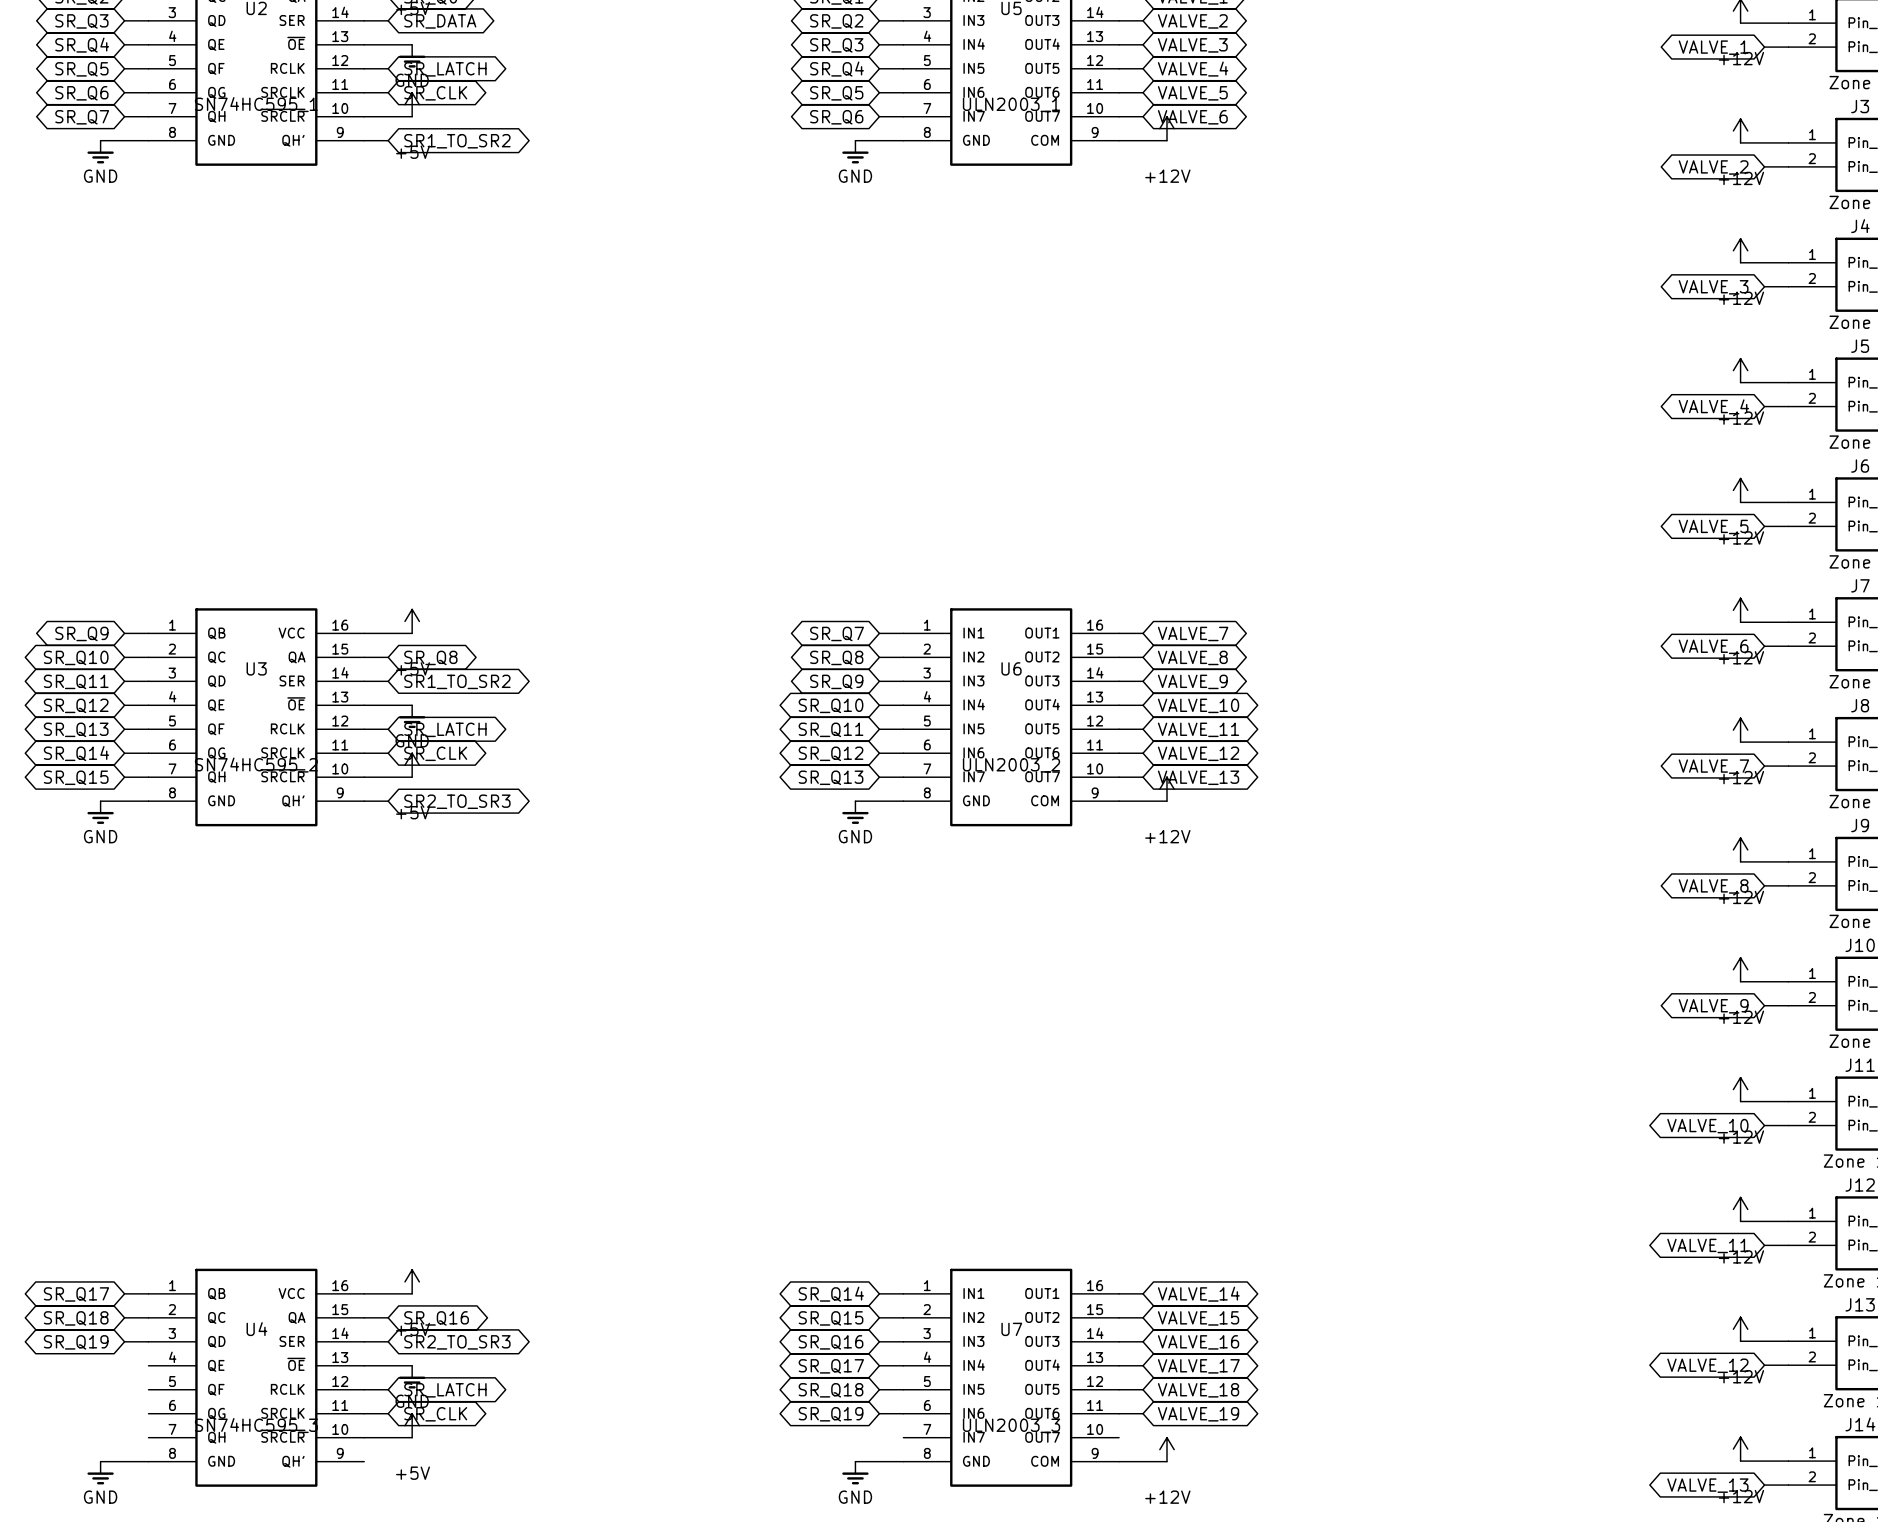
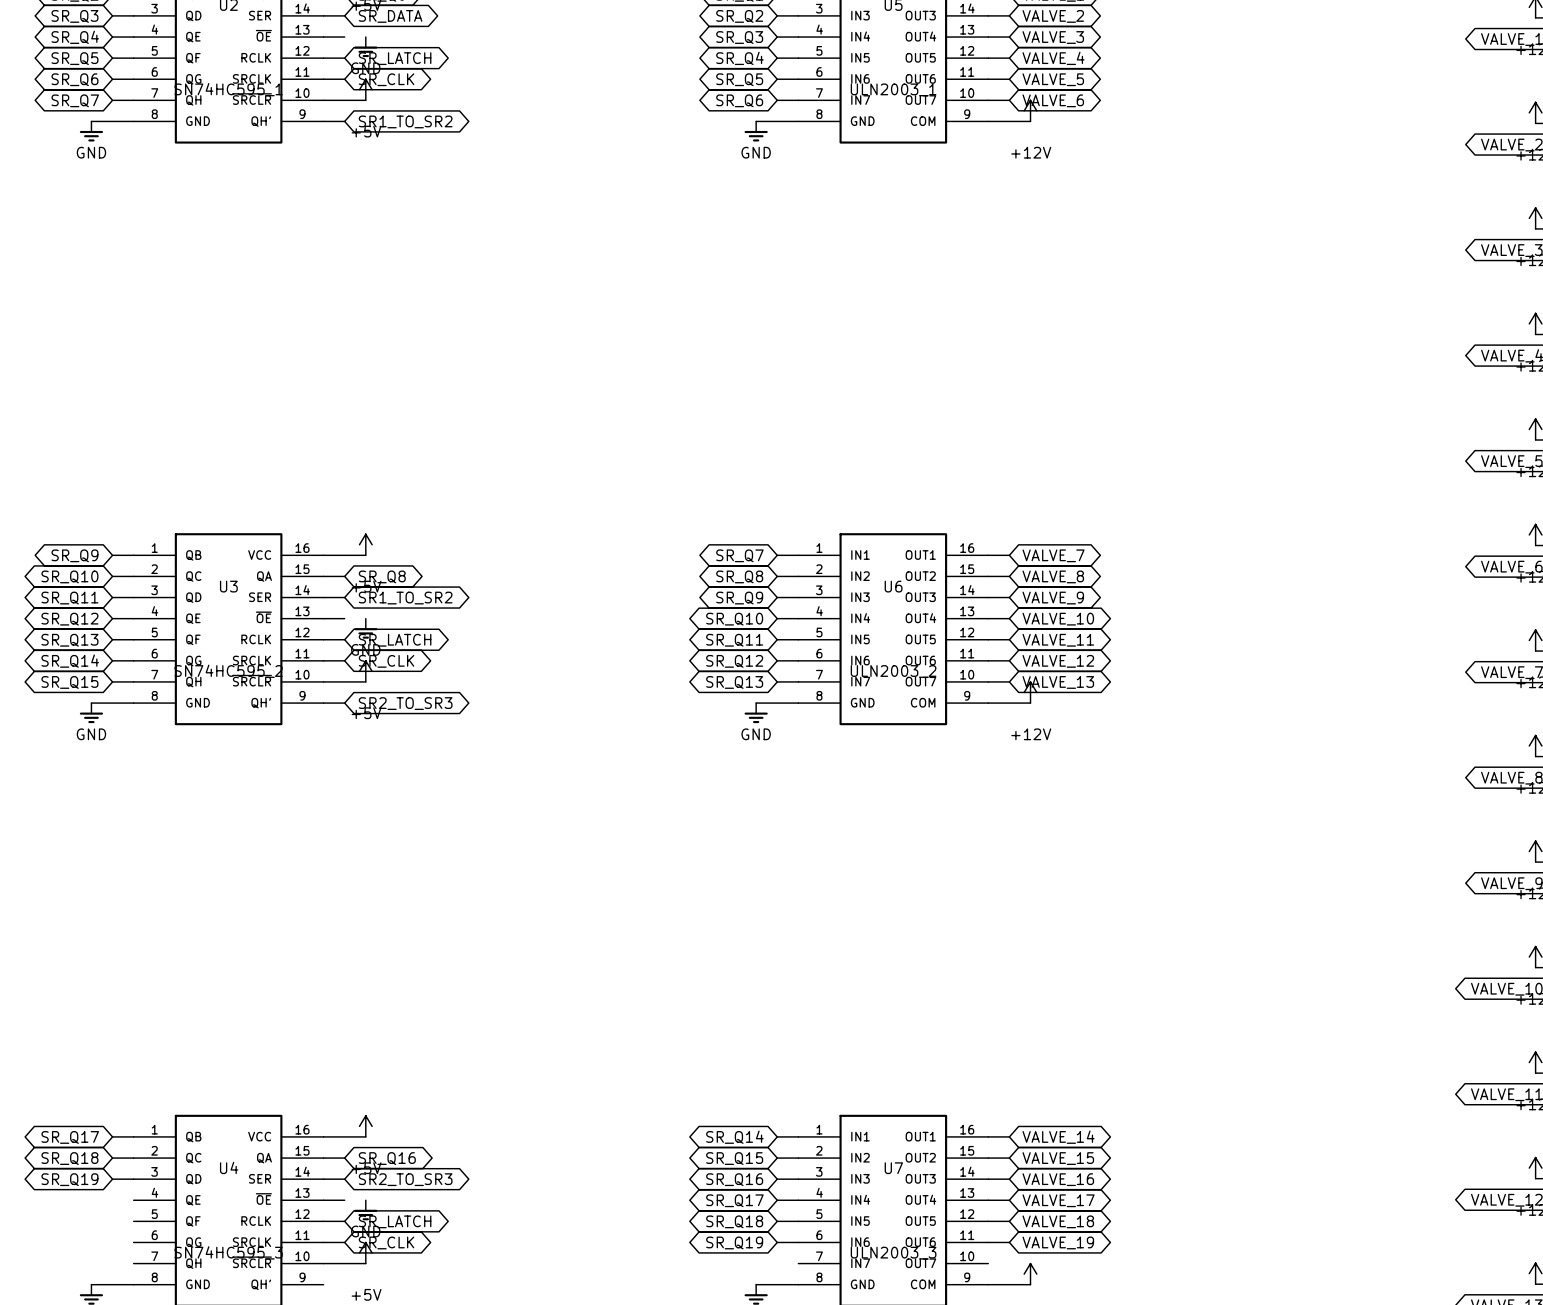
wire: (388, 44) (412, 44) -> none
wire: (388, 705) (412, 705) -> none
wire: (388, 1365) (412, 1365) -> none

